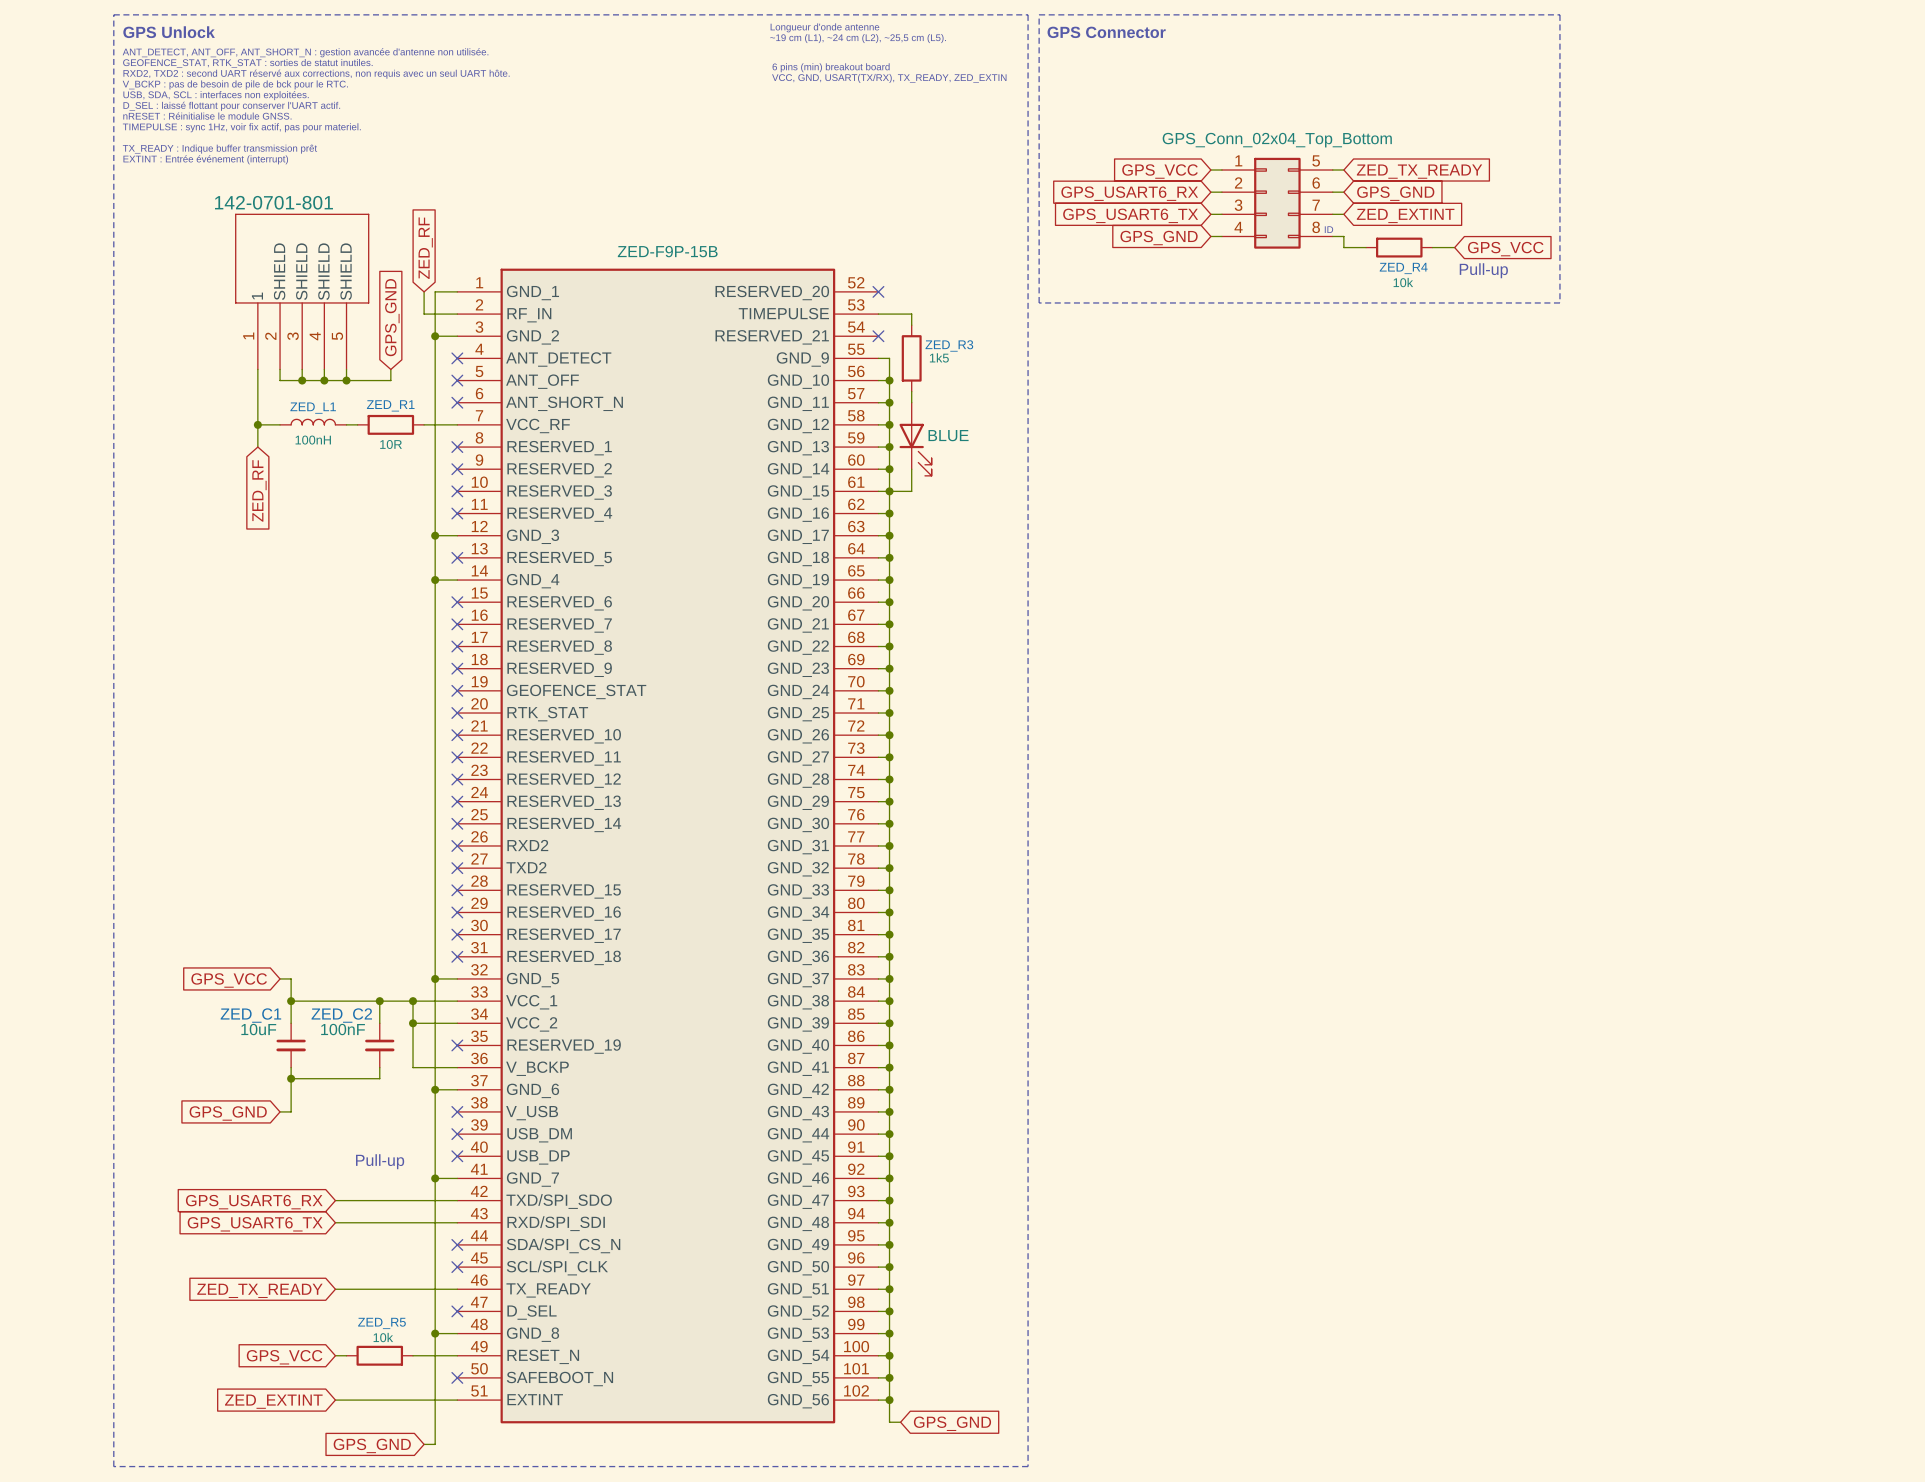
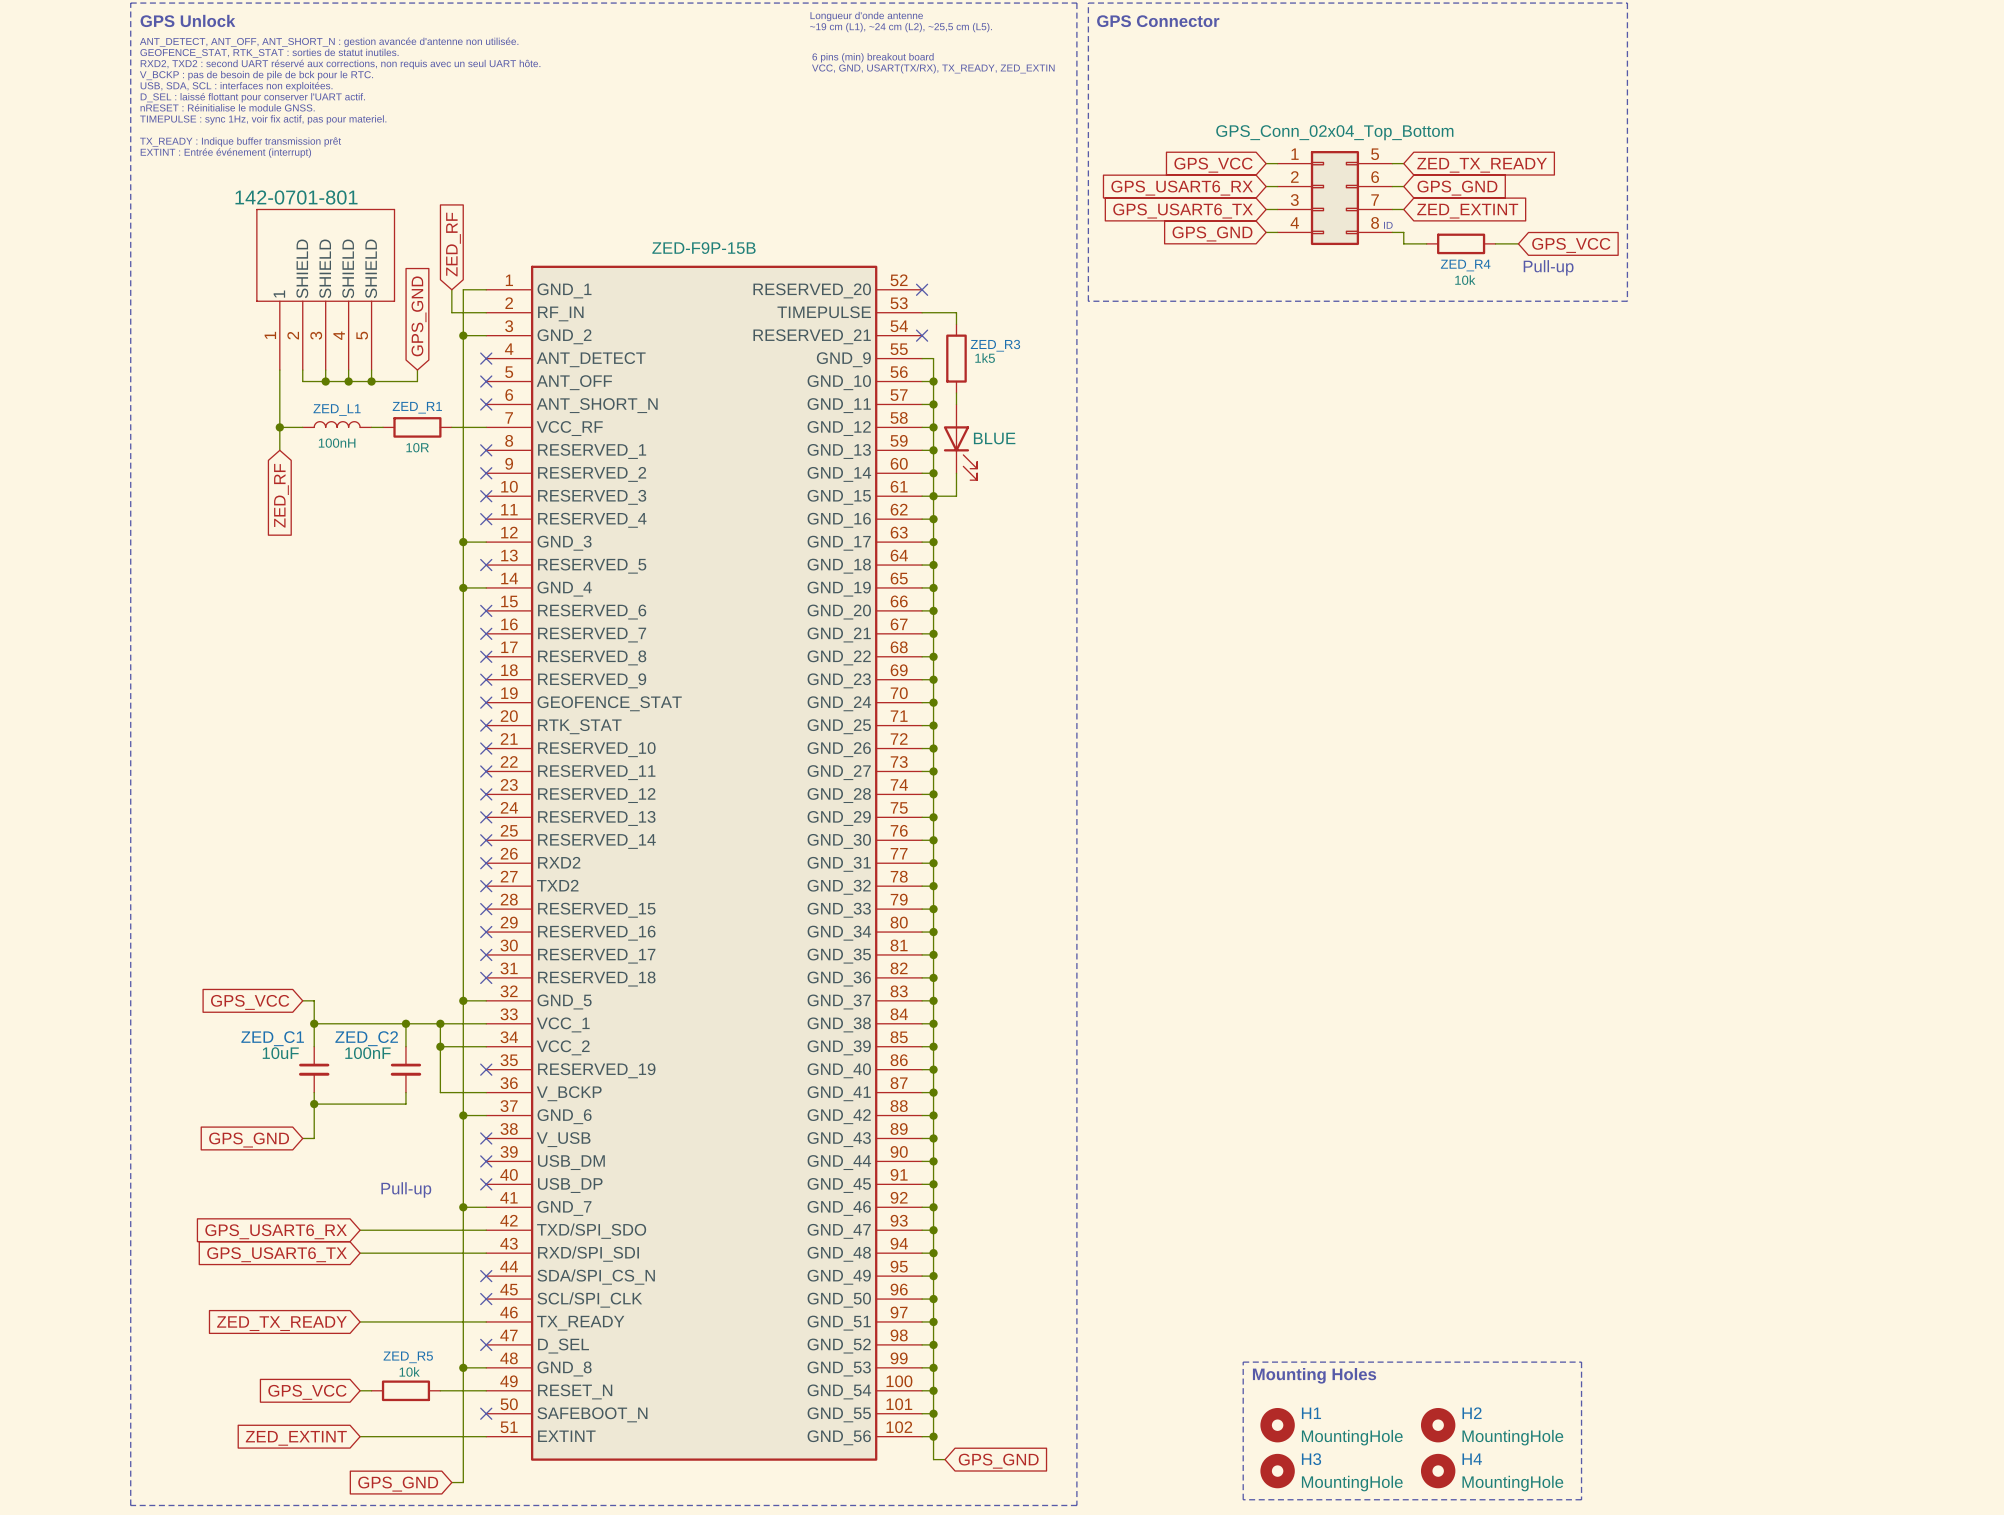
line: none -> (1243, 1362) (1581, 1362) (1581, 1499) (1243, 1499) (1243, 1362)
text: none -> Mounting Holes (1314, 1375)
H1: none -> MountingHole (1277, 1425)
H2: none -> MountingHole (1438, 1425)
H3: none -> MountingHole (1277, 1471)
H4: none -> MountingHole (1438, 1471)

